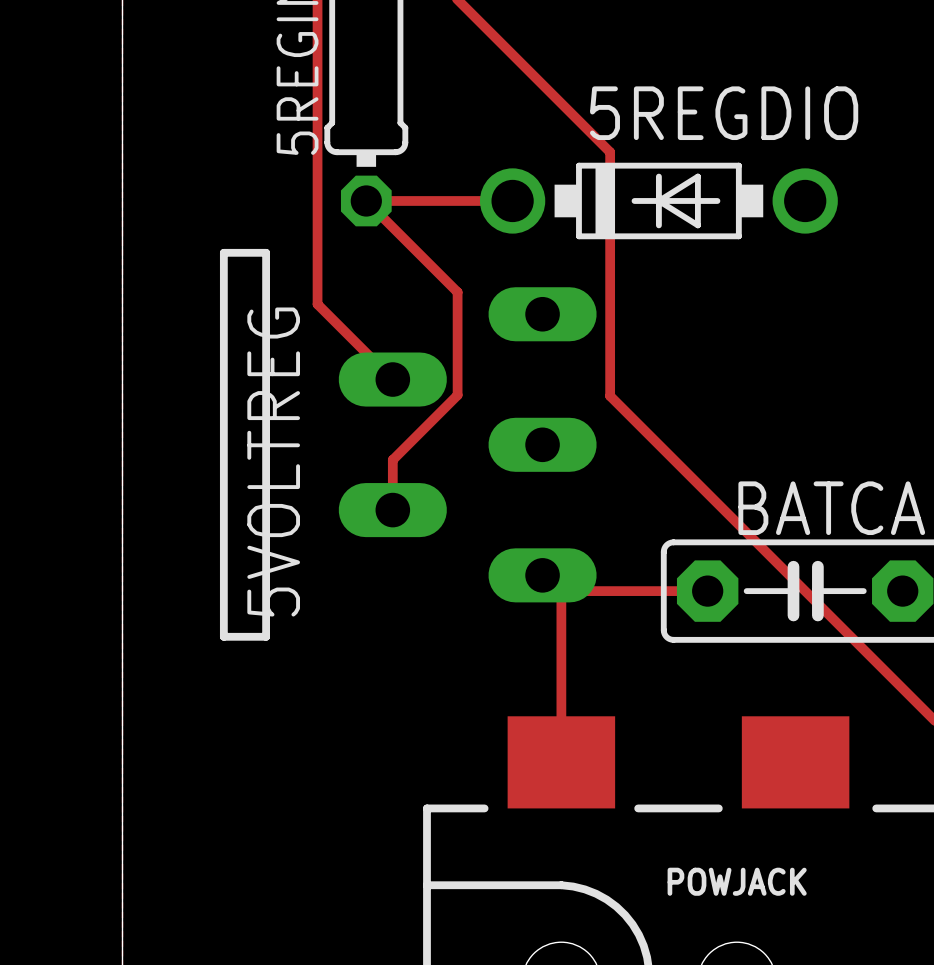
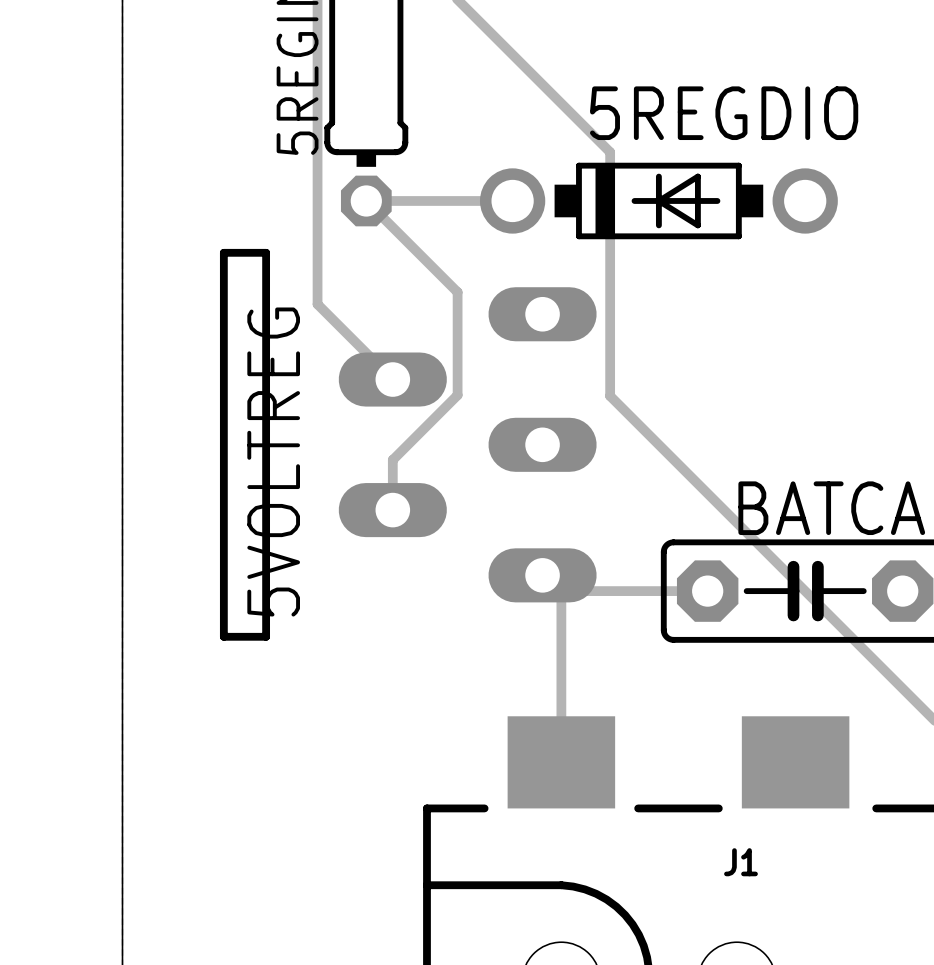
POWJACK name: POWJACK (737, 881) -> J1 (740, 862)

